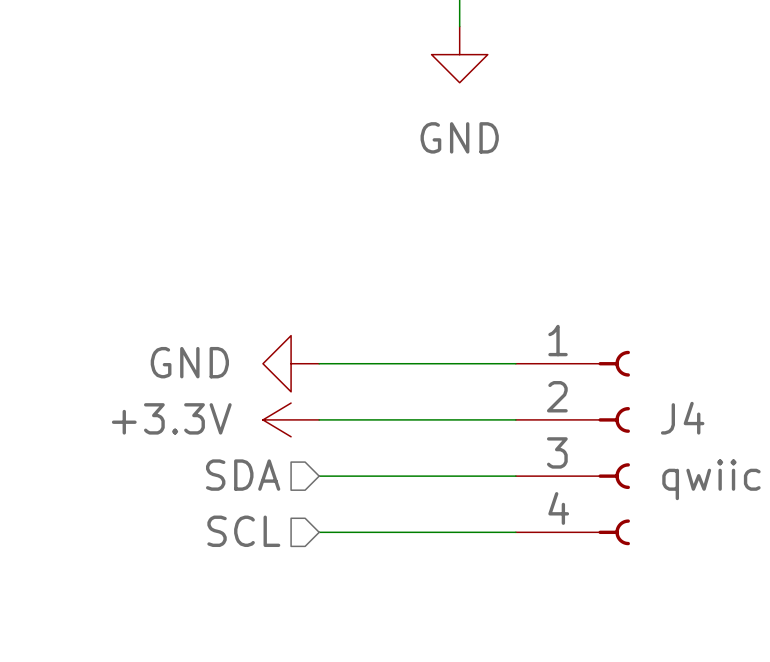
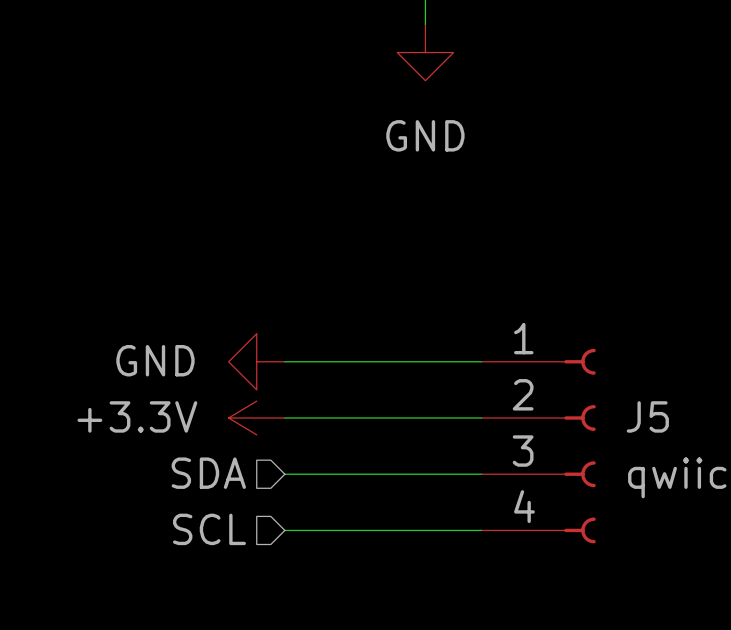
J4 name: J4 (682, 418) -> J5 (647, 416)

